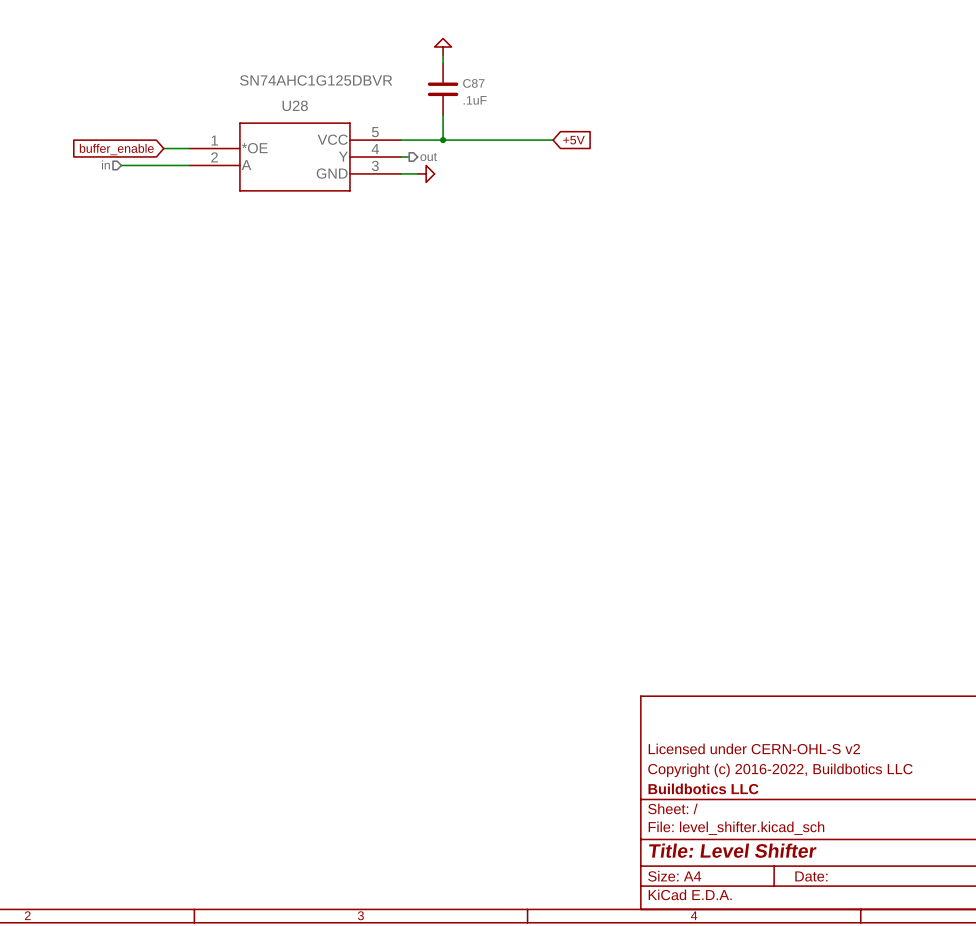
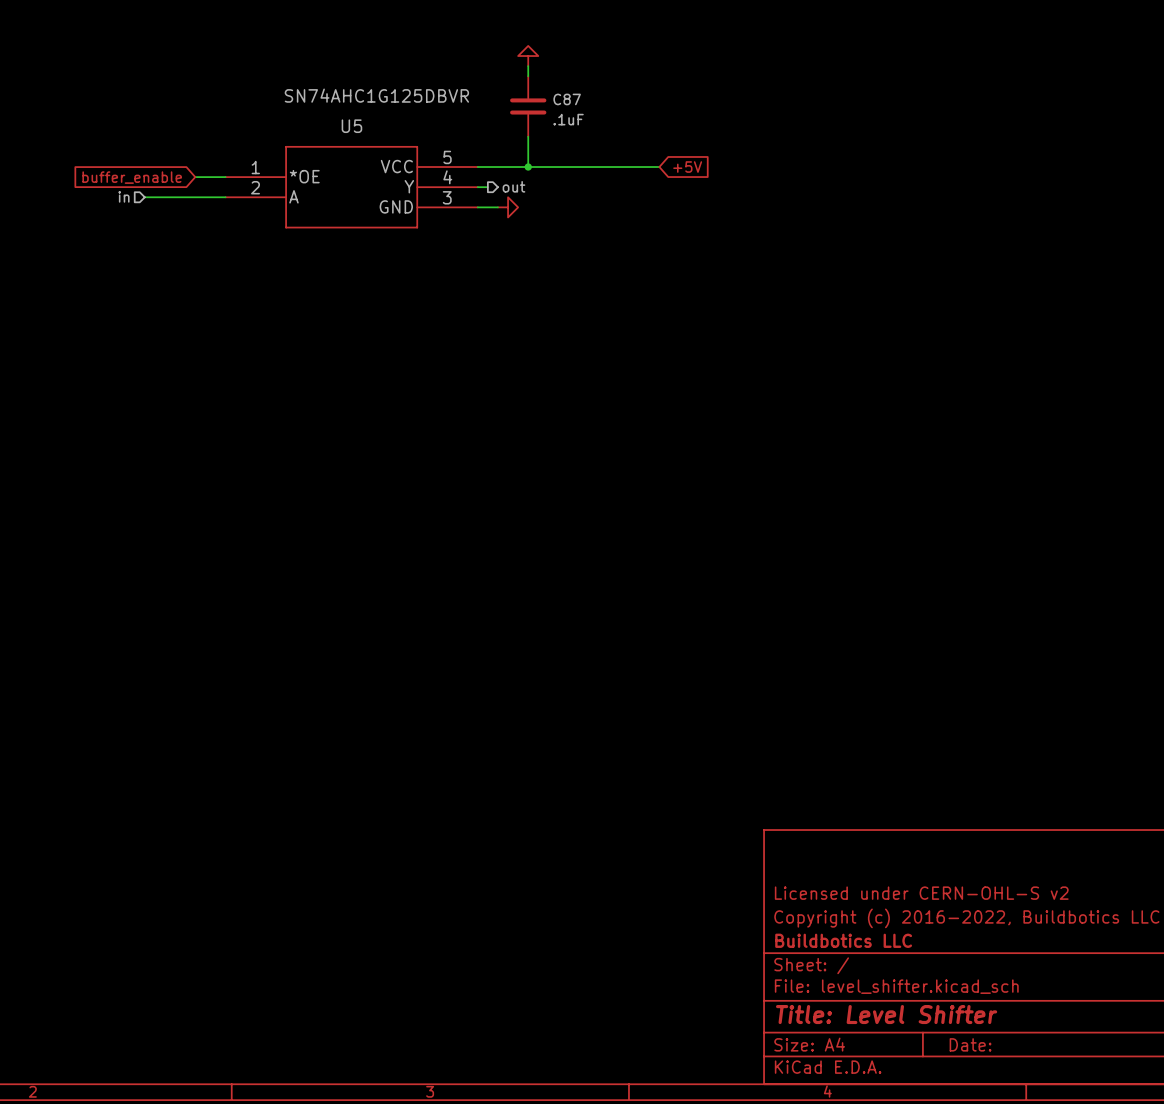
U28 name: U28 (295, 105) -> U5 (351, 126)

